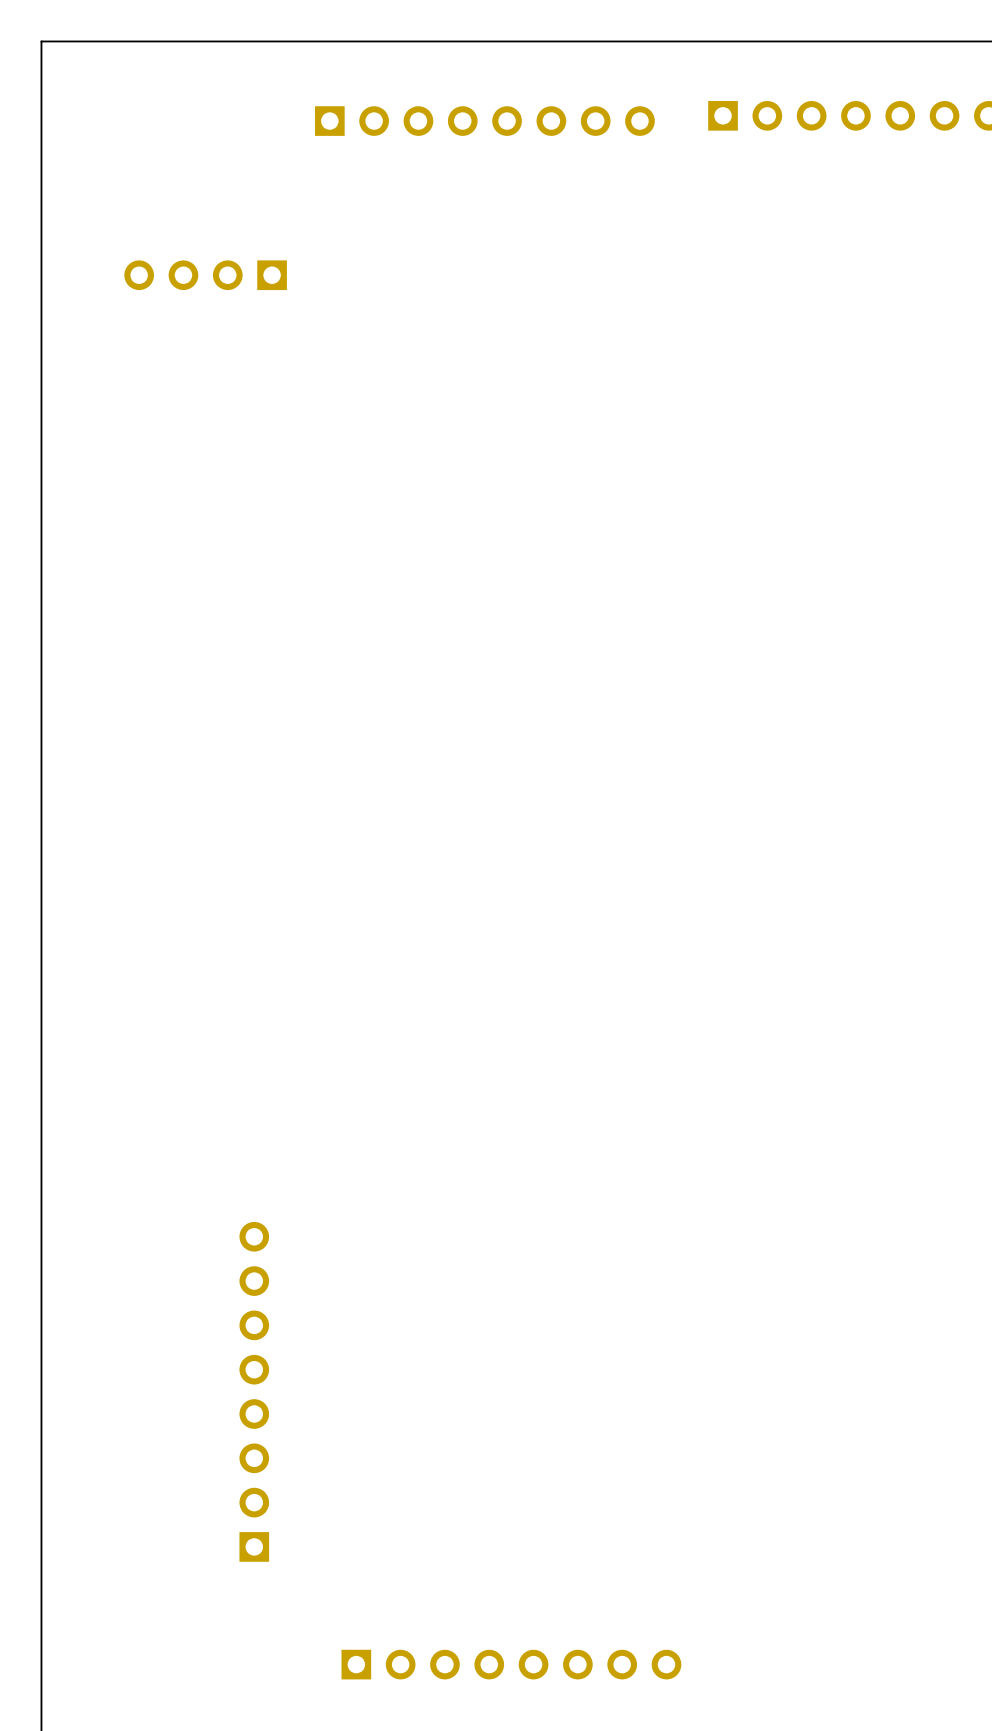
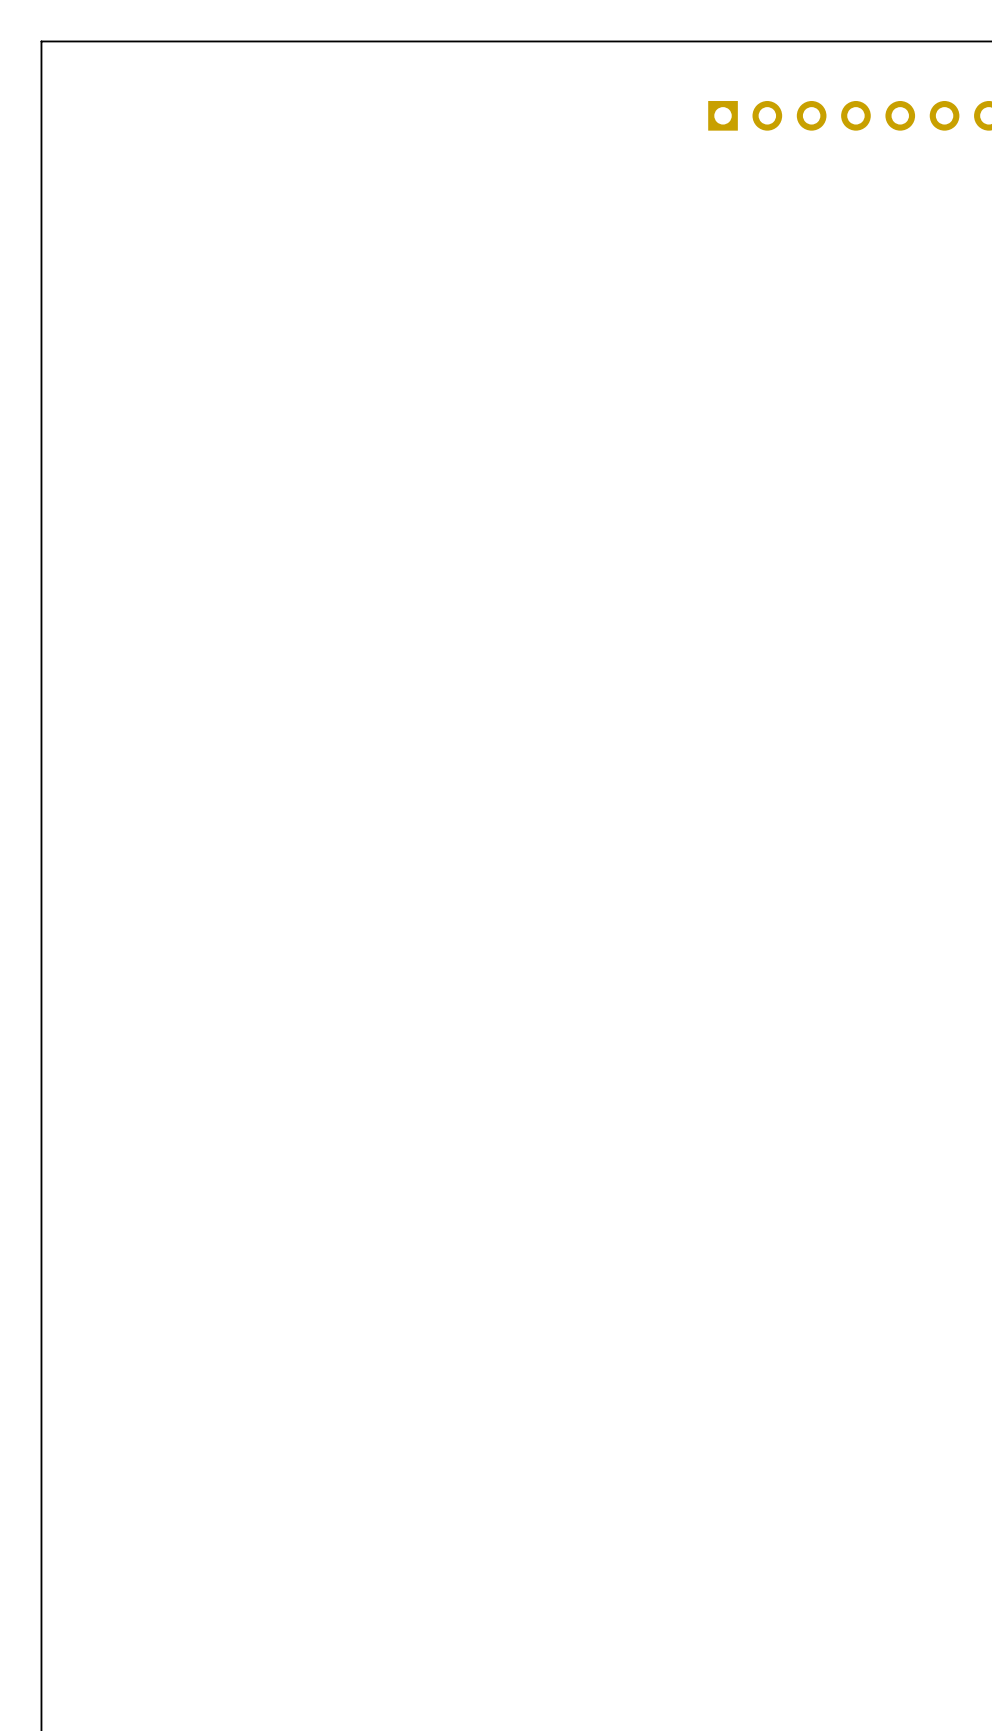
part: (484, 121) -> none
part: (205, 275) -> none
part: (254, 1391) -> none
part: (511, 1664) -> none

